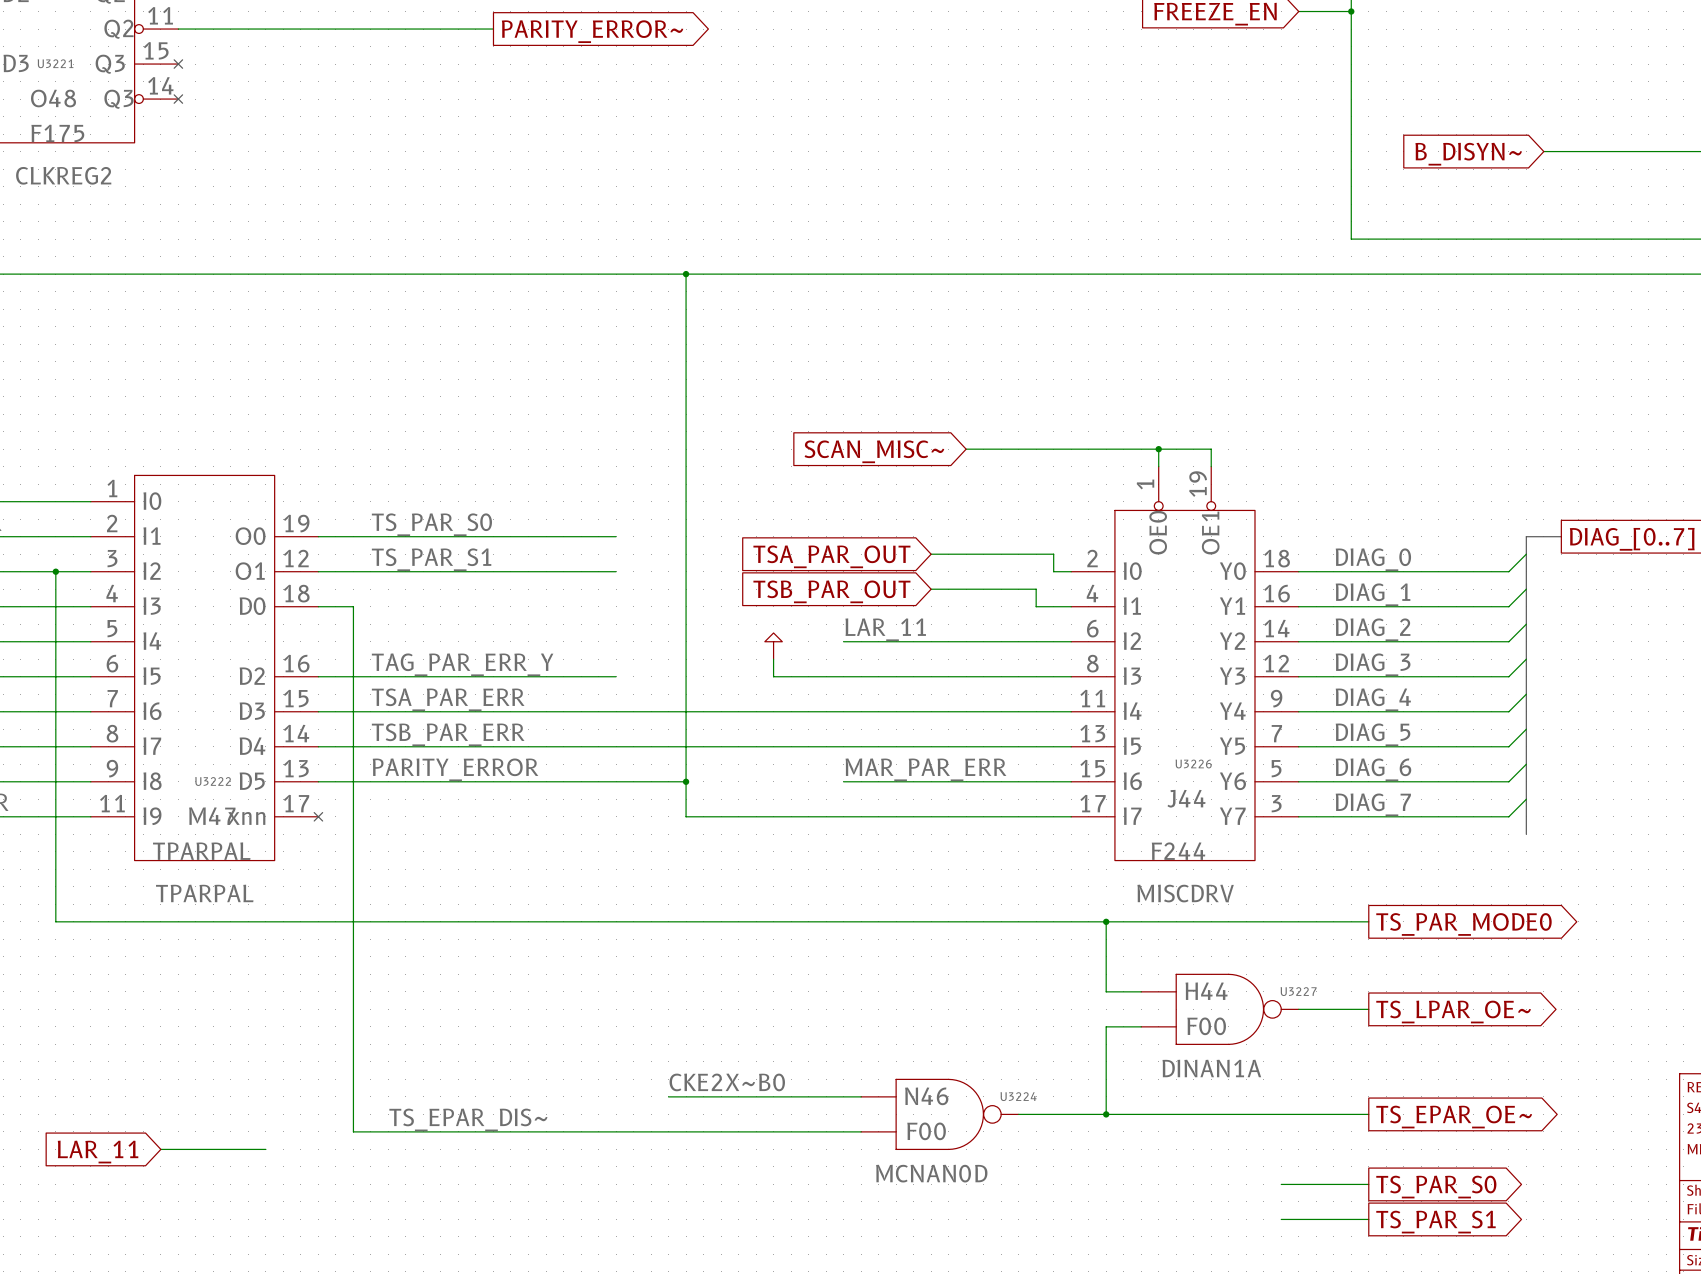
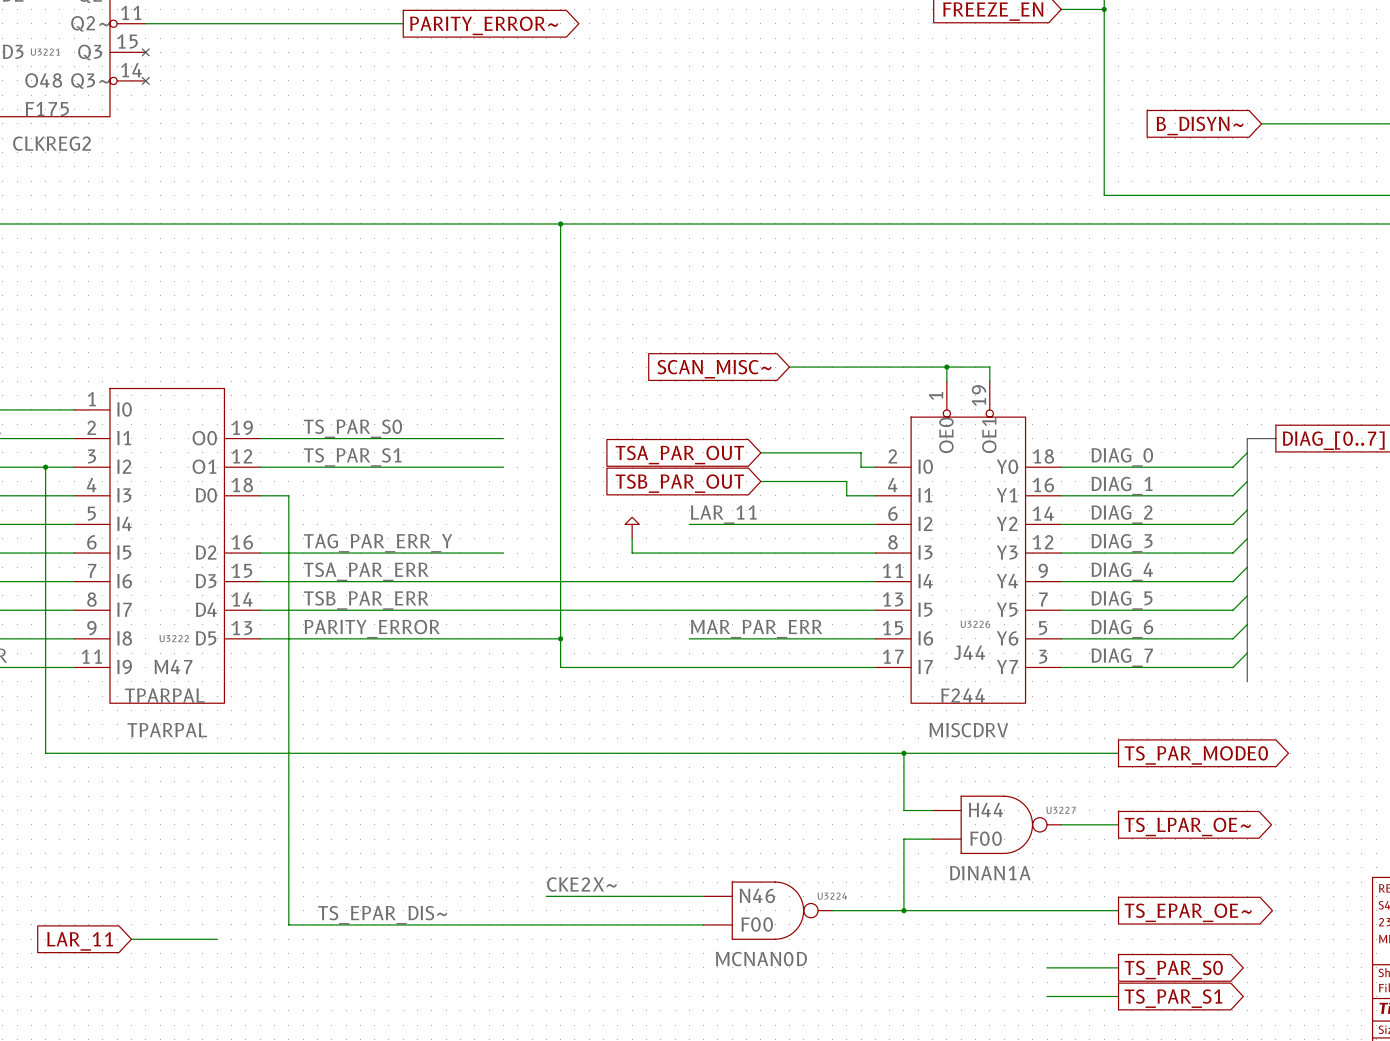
U3221 pin name: Q2 (118, 29) -> Q2~ (90, 23)
U3221 pin name: Q3 (118, 99) -> Q3~ (90, 81)
U3222 symbol: [90, 475, 319, 861] -> [74, 388, 261, 704]
no-connect mark: (318, 816) -> none
label: CKE2X~B0 (727, 1082) -> CKE2X~ (582, 884)

